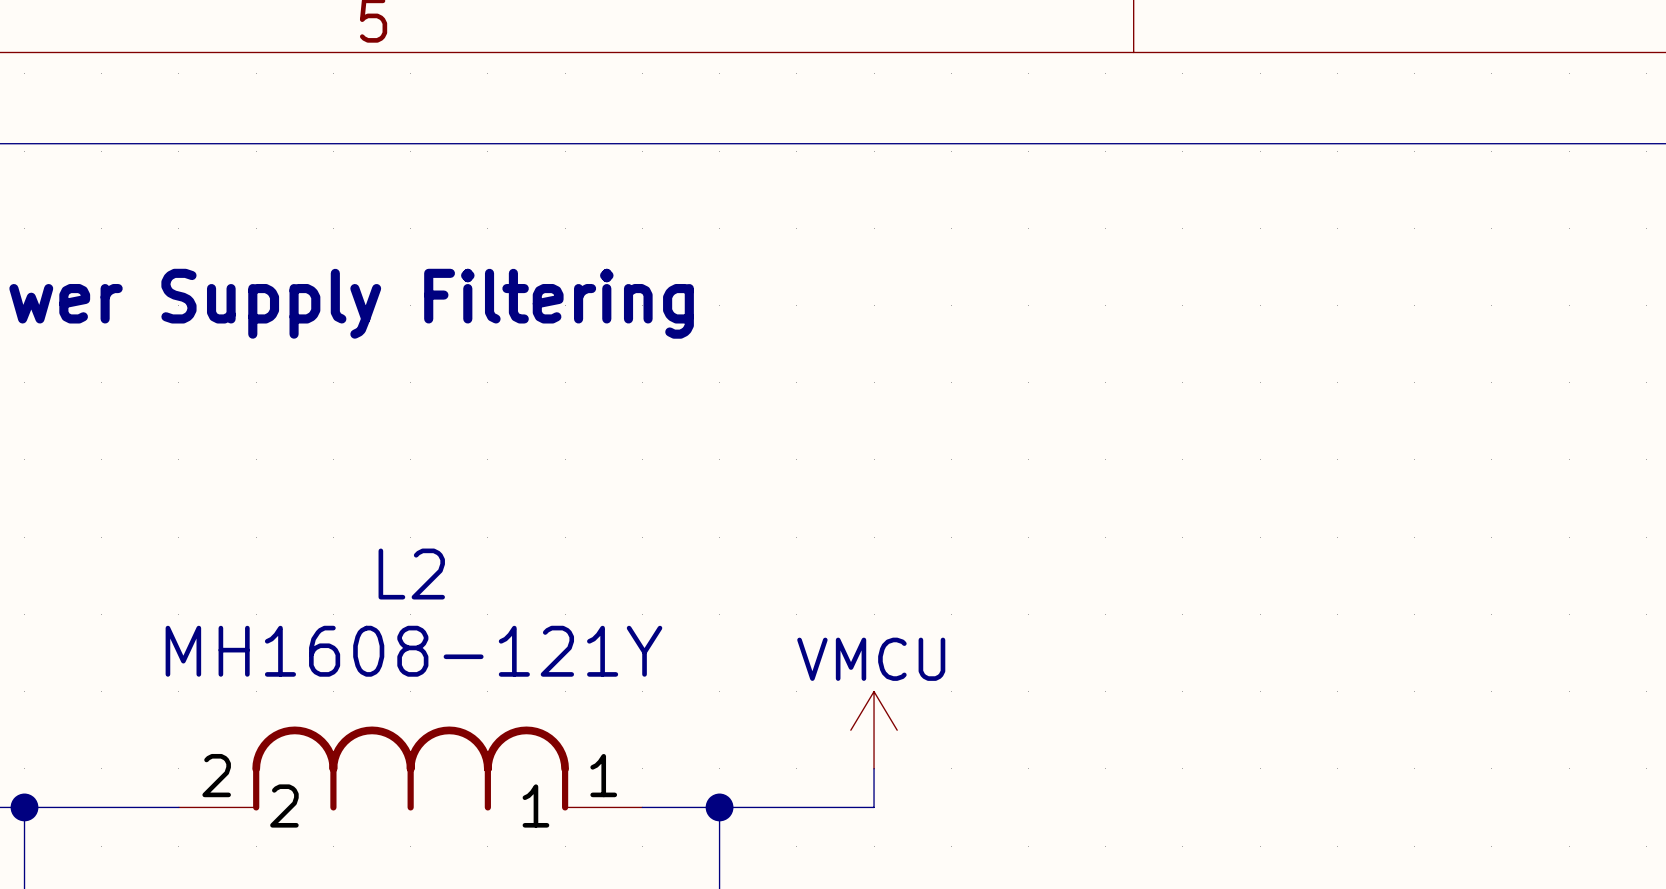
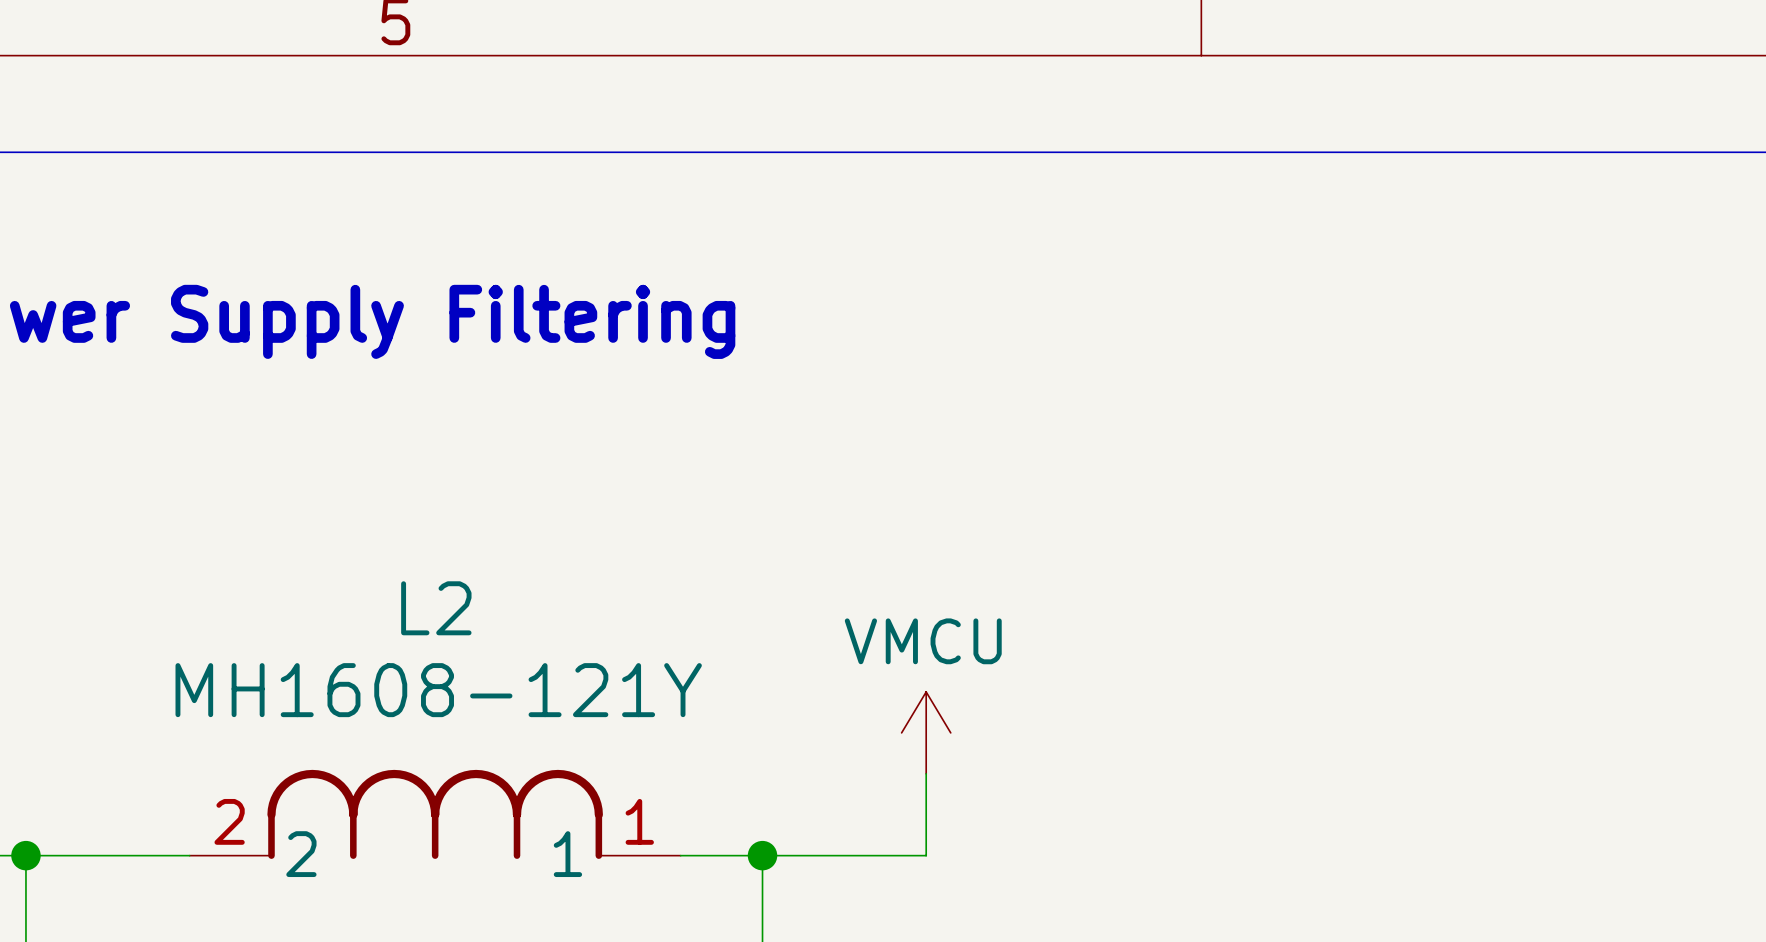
power symbol text position: VMCU (871, 659) -> VMCU (923, 641)
power symbol position: VMCU (874, 730) -> VMCU (926, 732)

